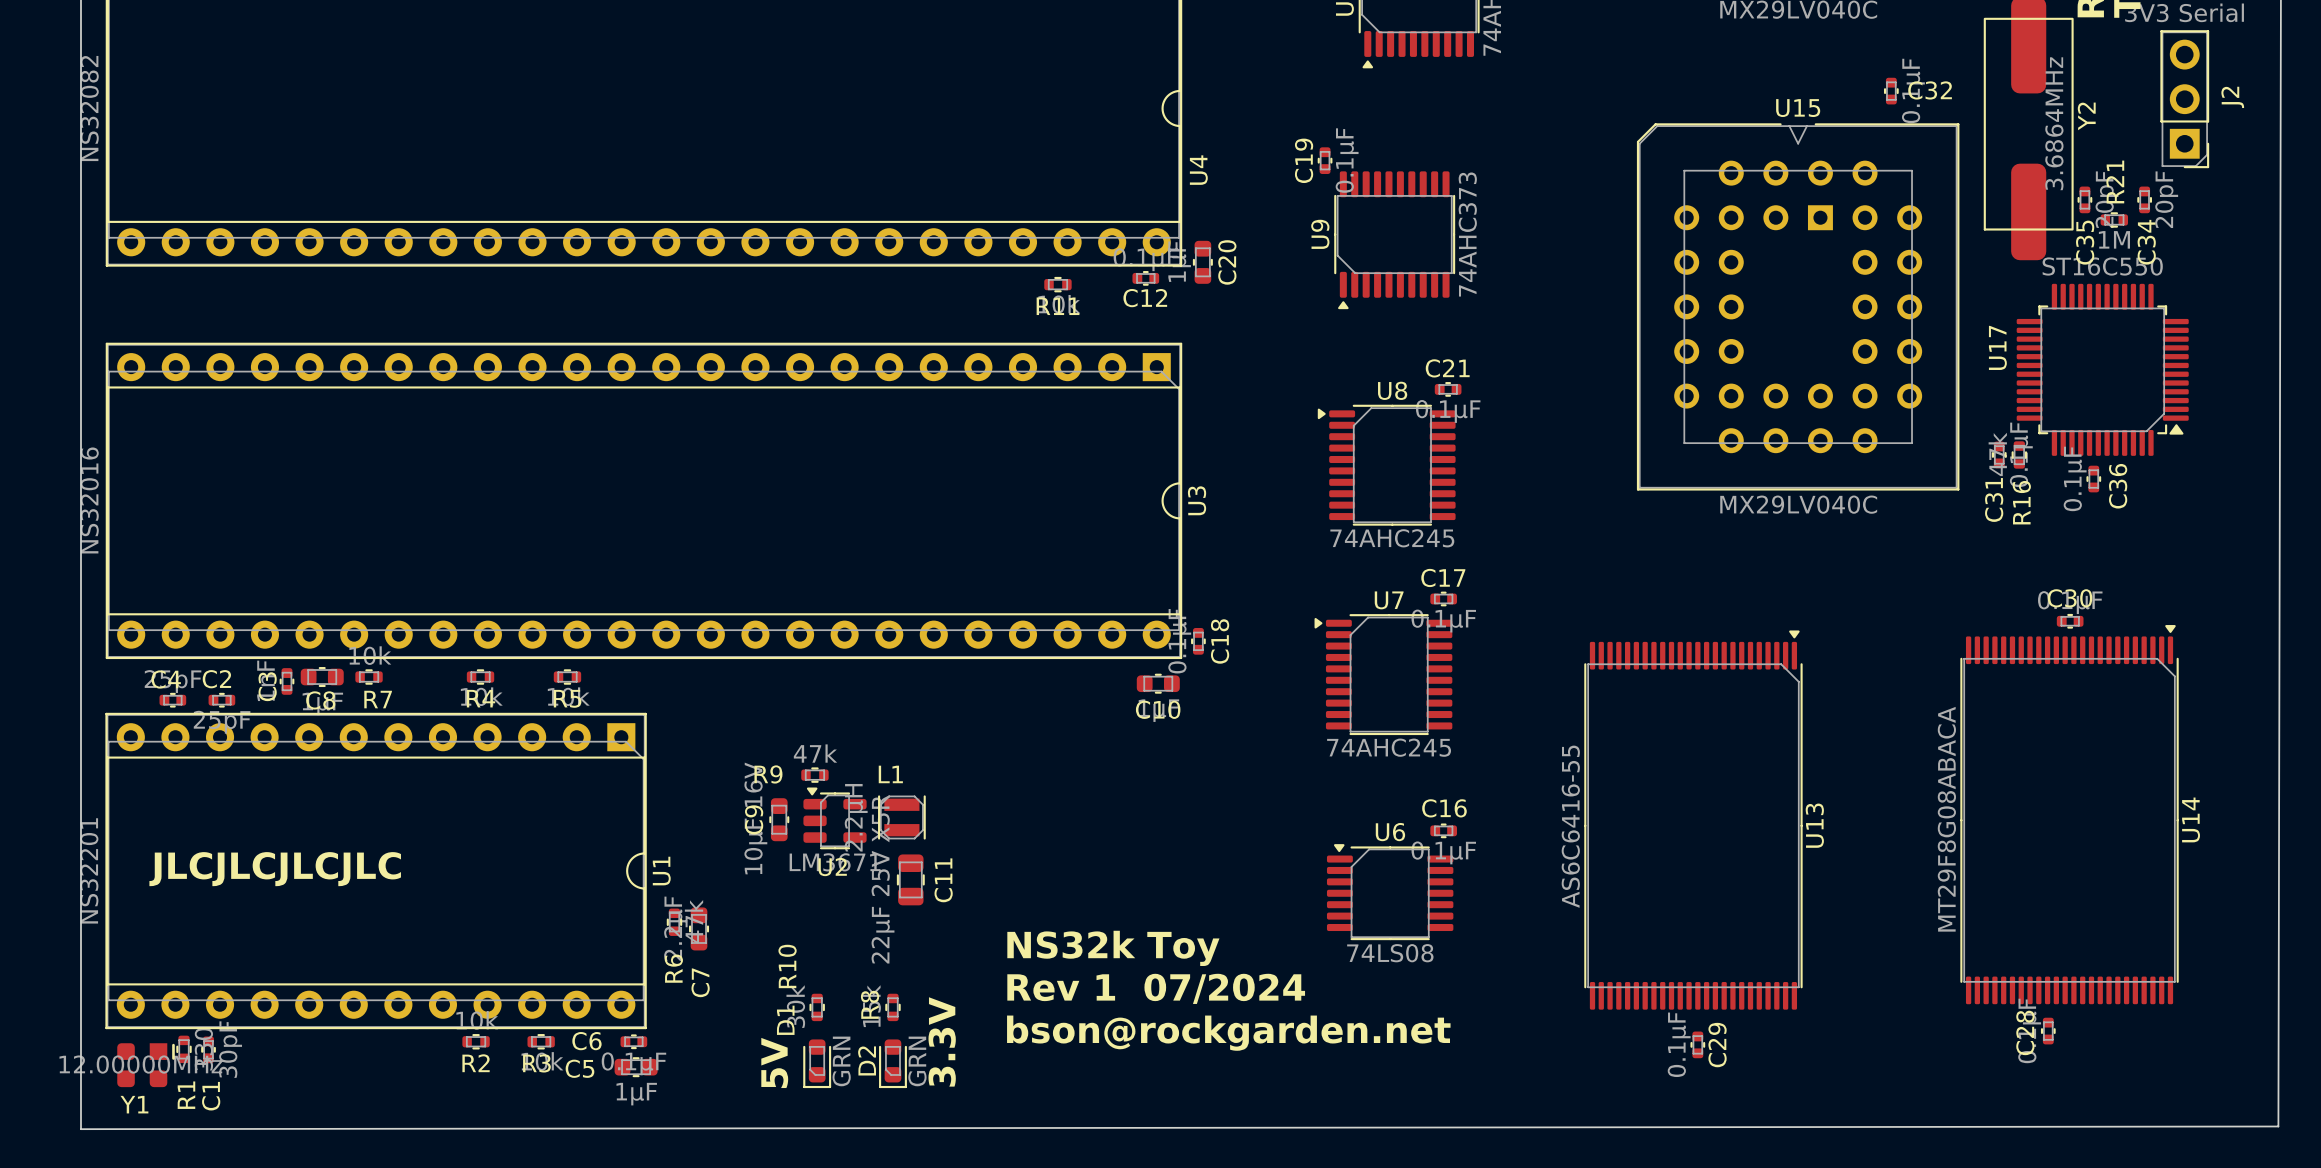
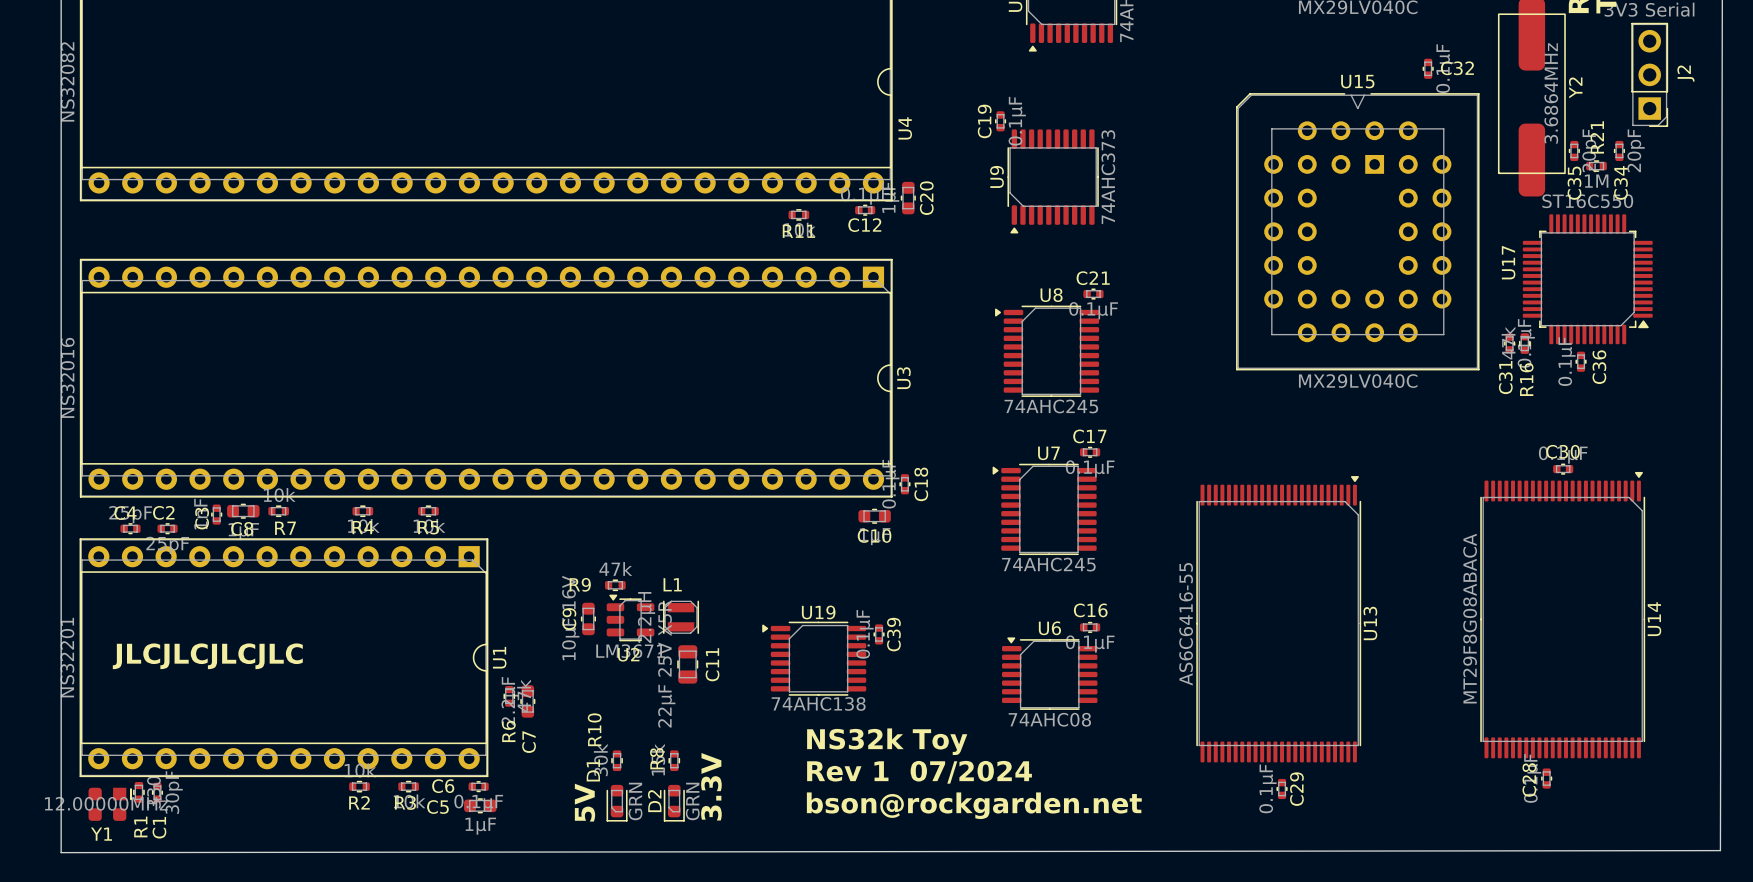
C39: none -> 0.1µF (879, 634)
U19: none -> 74AHC138 (814, 658)
text position: NS32k Toy (1113, 948) -> NS32k Toy (887, 741)
U6 value: 74LS08 (1390, 953) -> 74AHC08 (1049, 719)
text position: Rev 1 07/2024 (1156, 988) -> Rev 1 07/2024 (919, 772)
text position: bson@rockgarden.net (1228, 1033) -> bson@rockgarden.net (974, 805)

